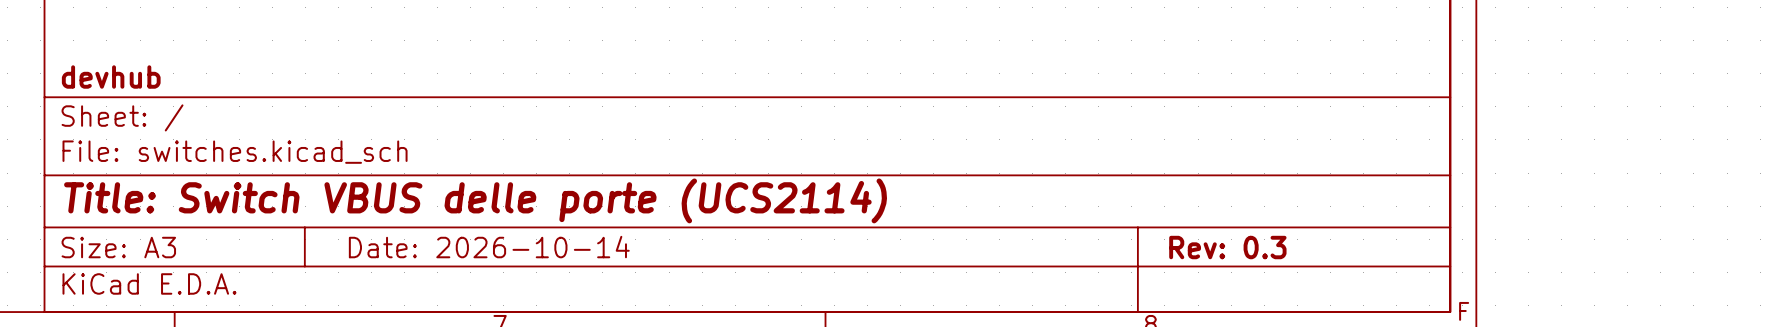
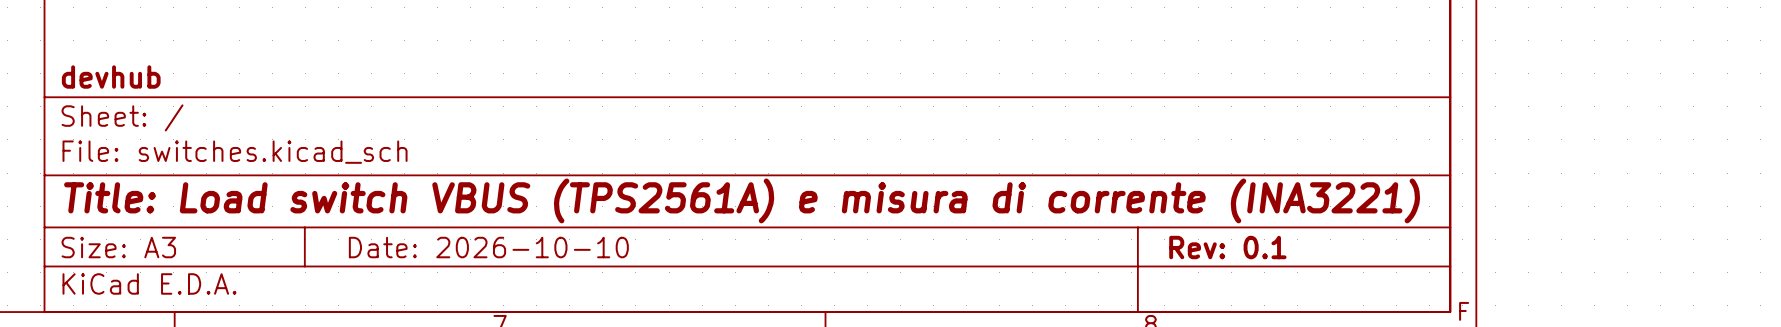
title block: Title: Switch VBUS delle porte (UCS2114) (475, 200) -> Title: Load switch VBUS (TPS2561A) e misura di corrente (INA3221) (742, 200)
title block: Date: 2026-10-14 (489, 247) -> Date: 2026-10-10 (488, 247)
title block: Rev: 0.3 (1227, 247) -> Rev: 0.1 (1227, 247)

